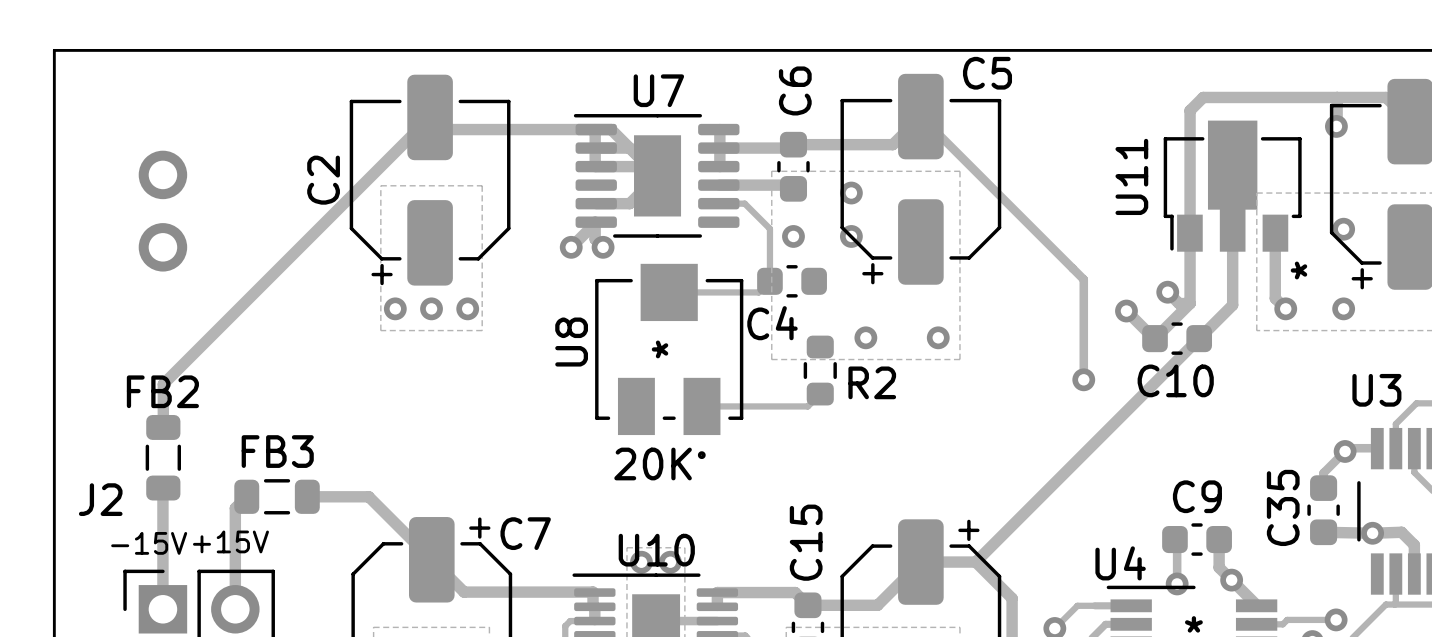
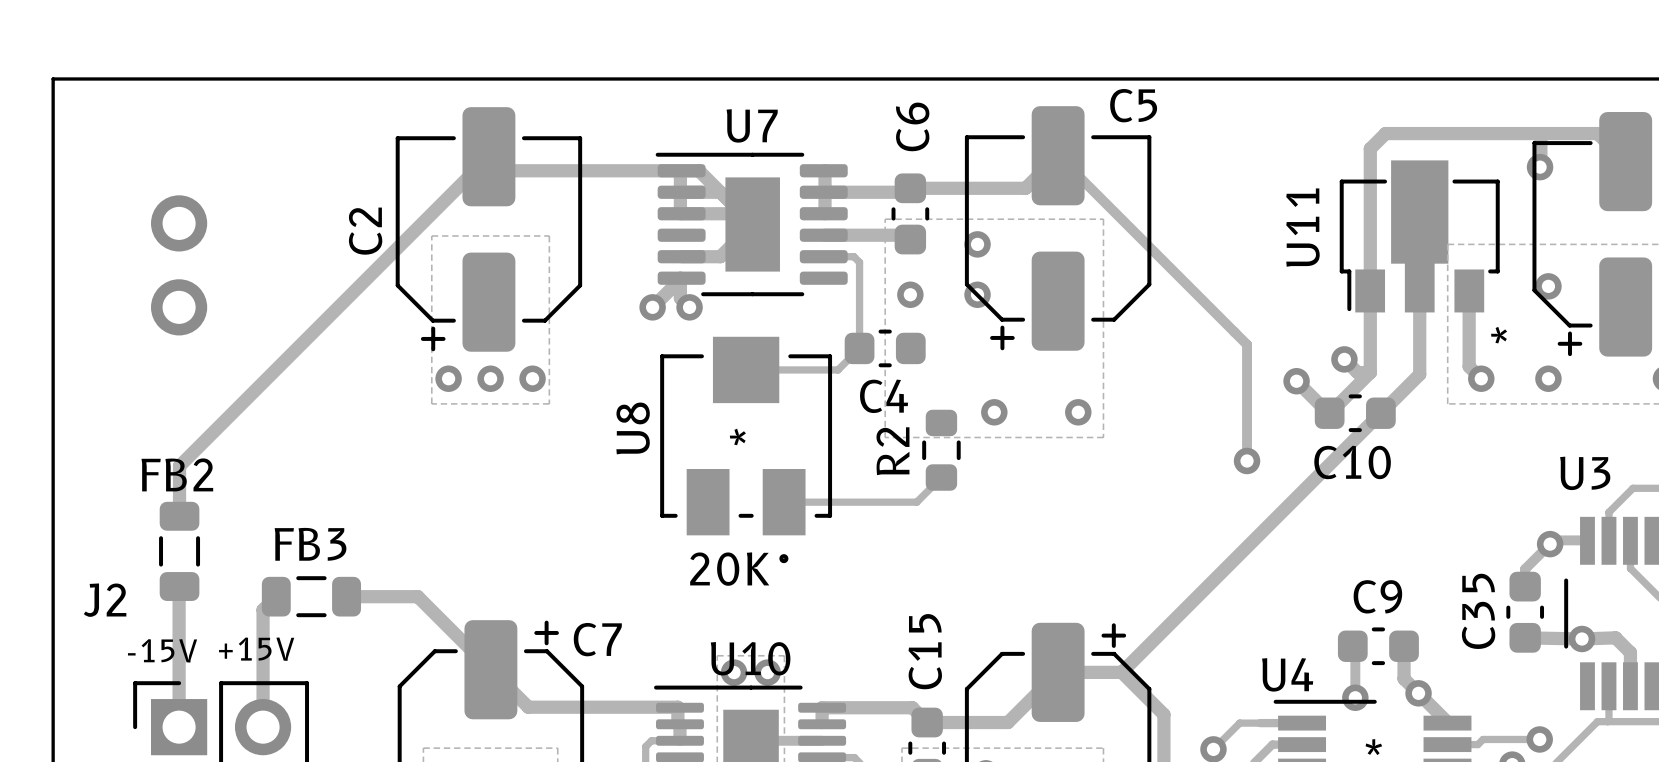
track: (749, 208) (769, 228) (769, 281) (758, 292) (669, 292) -> (859, 262) (859, 348) (838, 369) (746, 369)
C4 position: (792, 281) -> (885, 348)
U8 position: (669, 361) -> (746, 449)
R2 name rotation: 0° (872, 382) -> 90° counterclockwise (892, 451)
R2 name position: R2 (872, 382) -> R2 (892, 451)
track: (701, 406) (807, 406) -> (784, 502) (916, 502) (927, 491)

